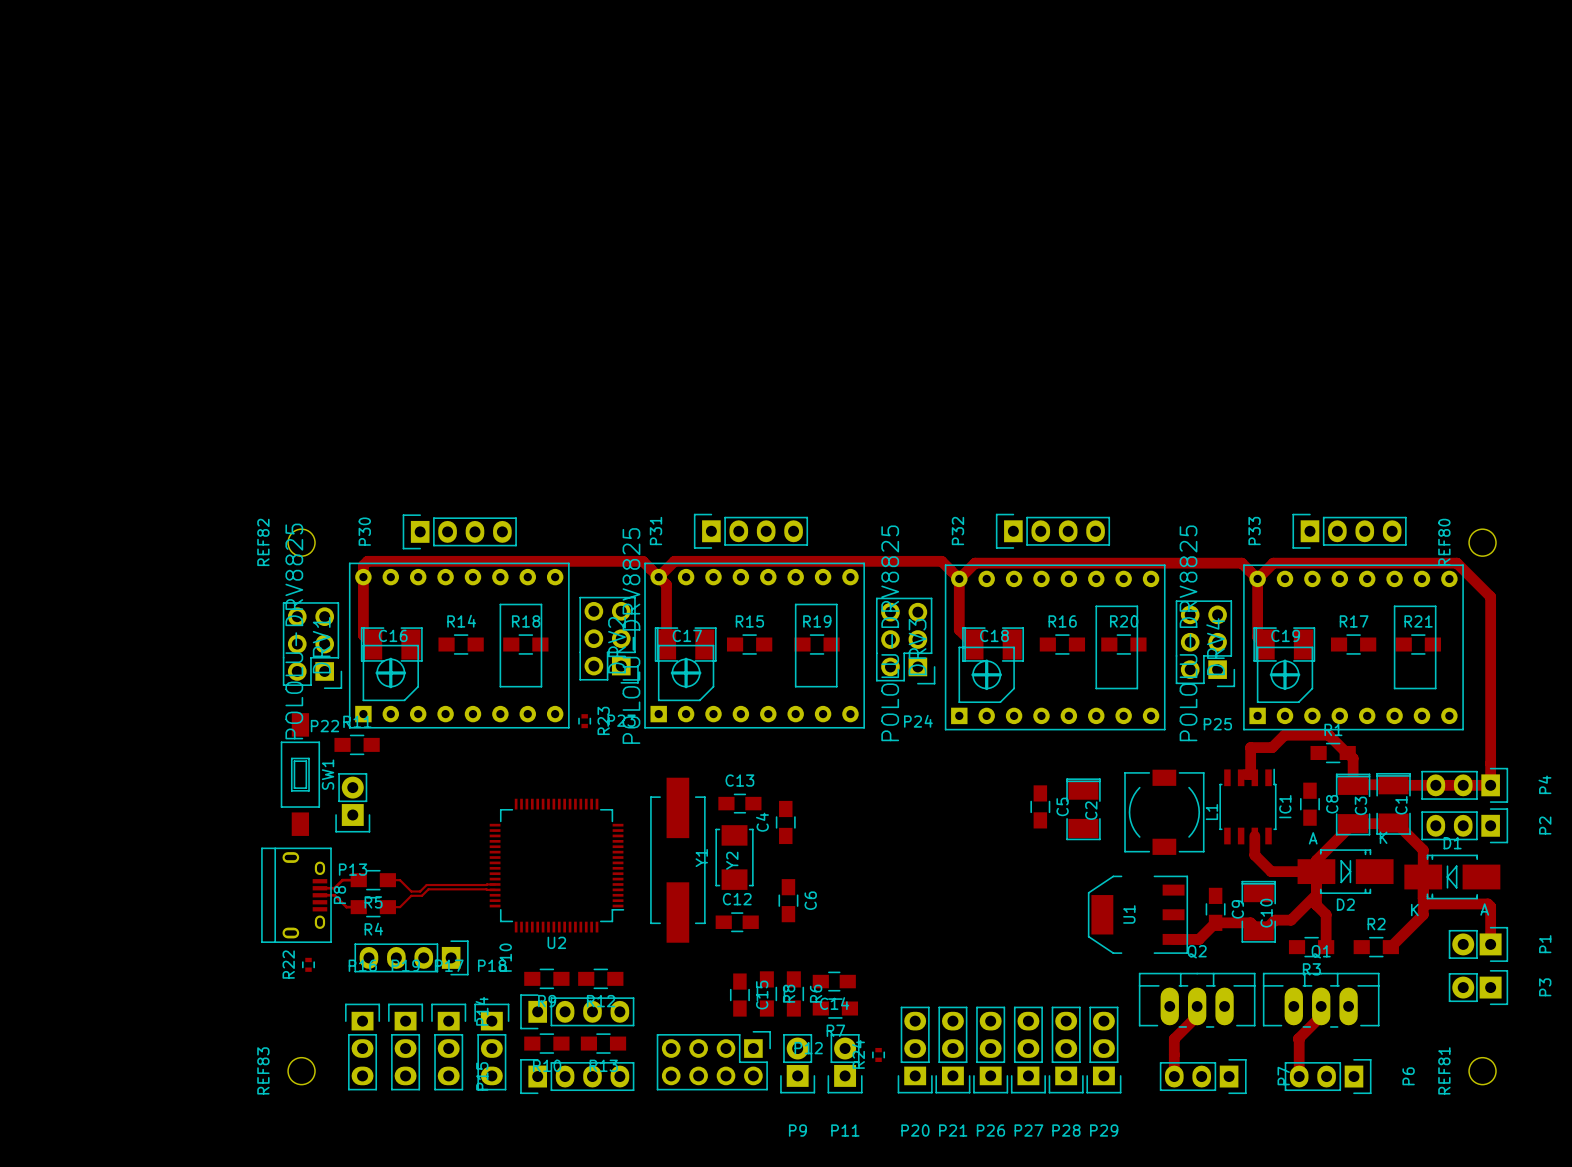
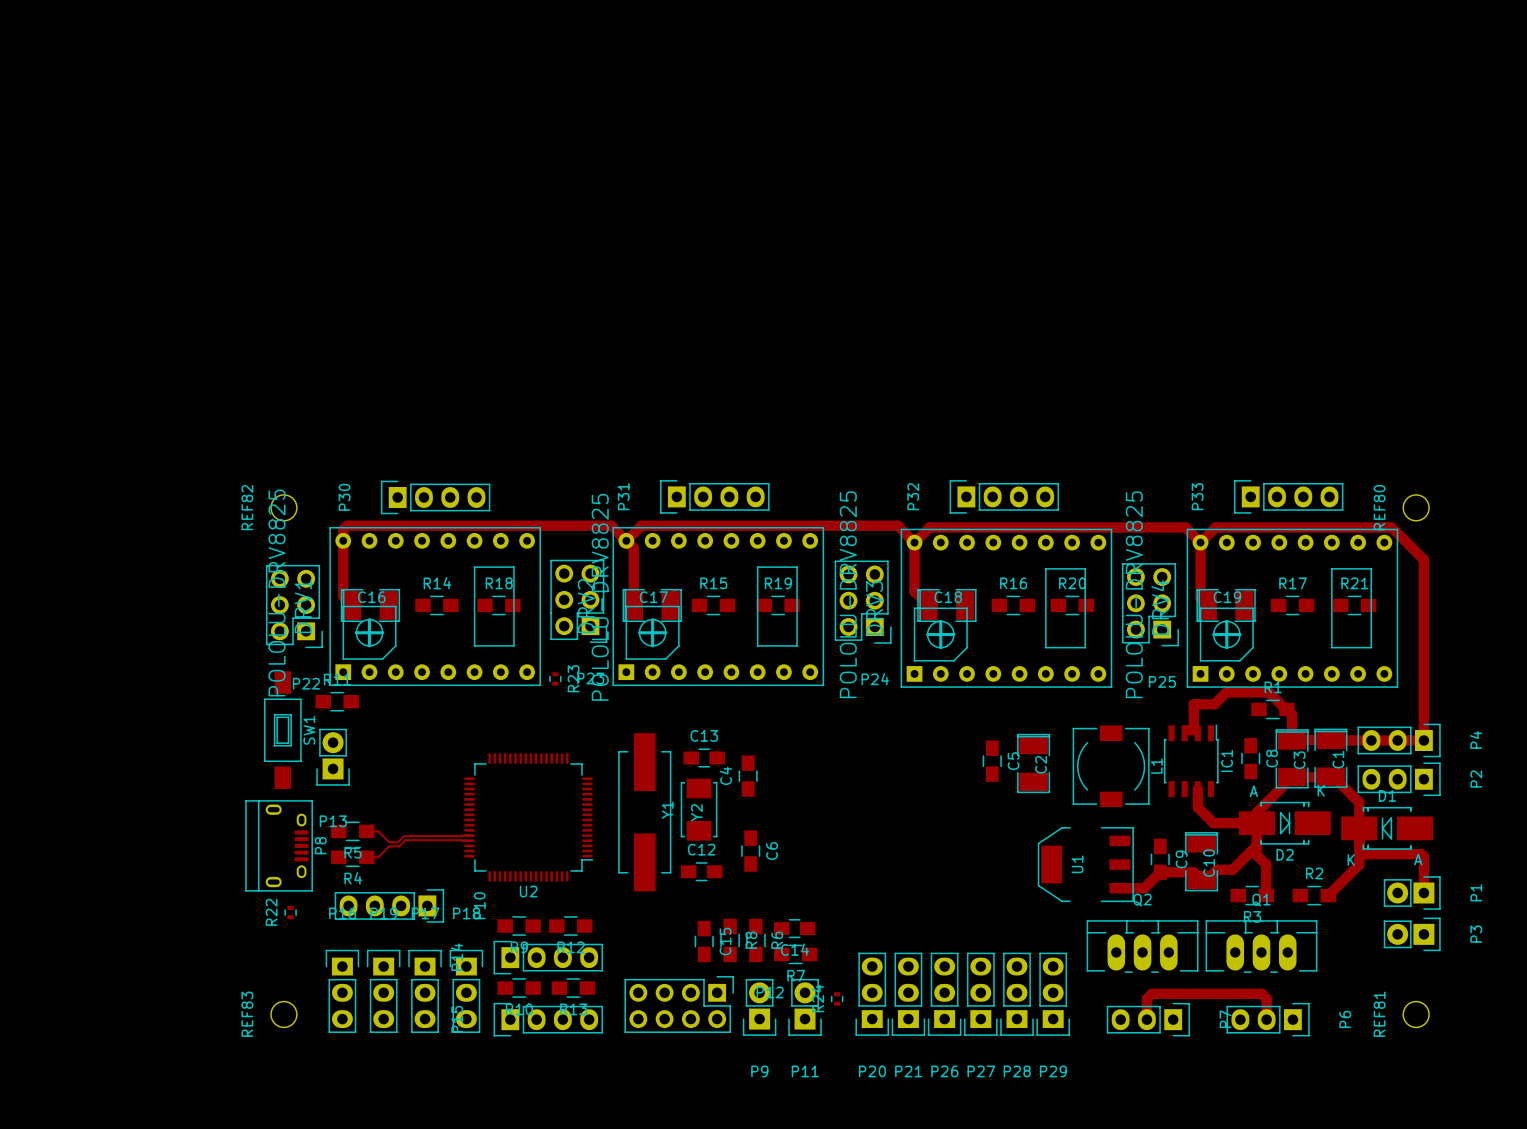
track: (358, 880) (342, 880) (334, 888) (319, 888) -> none
track: (319, 895) (334, 895) (346, 907) (358, 907) -> none
track: (1197, 1006) (1197, 1016) (1174, 1039) (1174, 1076) -> none
track: (1321, 1006) (1321, 1016) (1298, 1038) (1299, 1076) -> none
track: none -> (1146, 1019) (1146, 998) (1151, 993) (1261, 993) (1266, 998) (1266, 1019)

